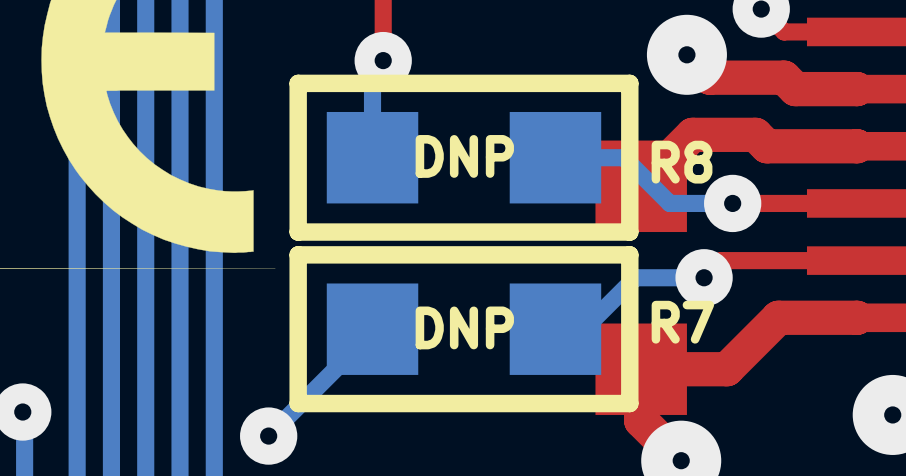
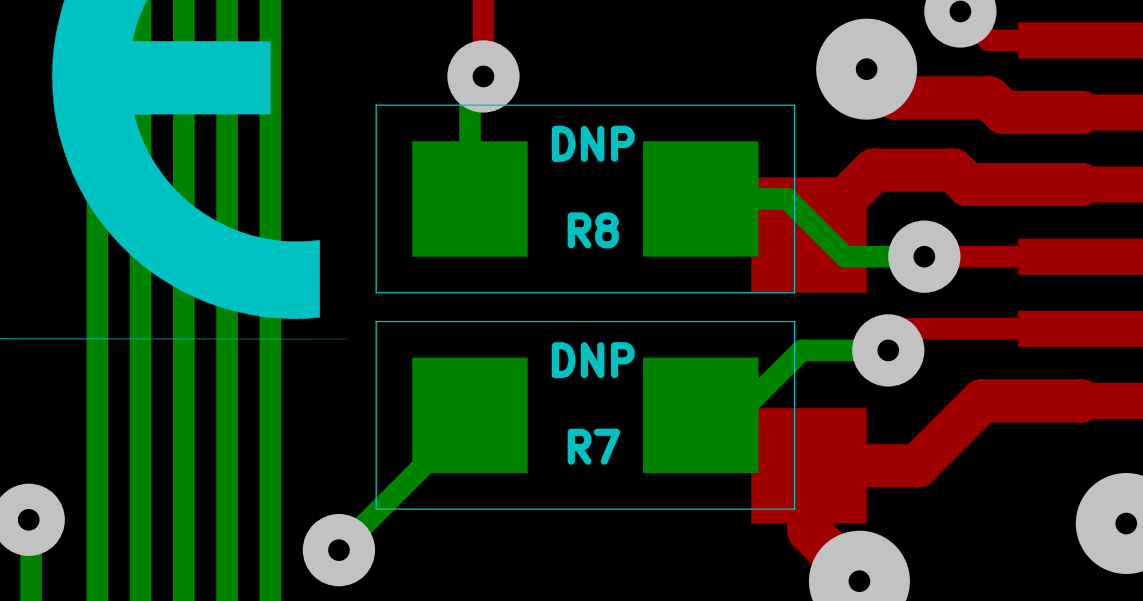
R8 footprint: [289, 74, 639, 241] -> [376, 105, 795, 293]
R8 value position: DNP (464, 156) -> DNP (593, 143)
R8 name position: R8 (682, 162) -> R8 (593, 230)
R7 footprint: [289, 246, 639, 413] -> [376, 321, 795, 510]
R7 name position: R7 (682, 322) -> R7 (593, 446)
R7 value position: DNP (464, 327) -> DNP (593, 360)

